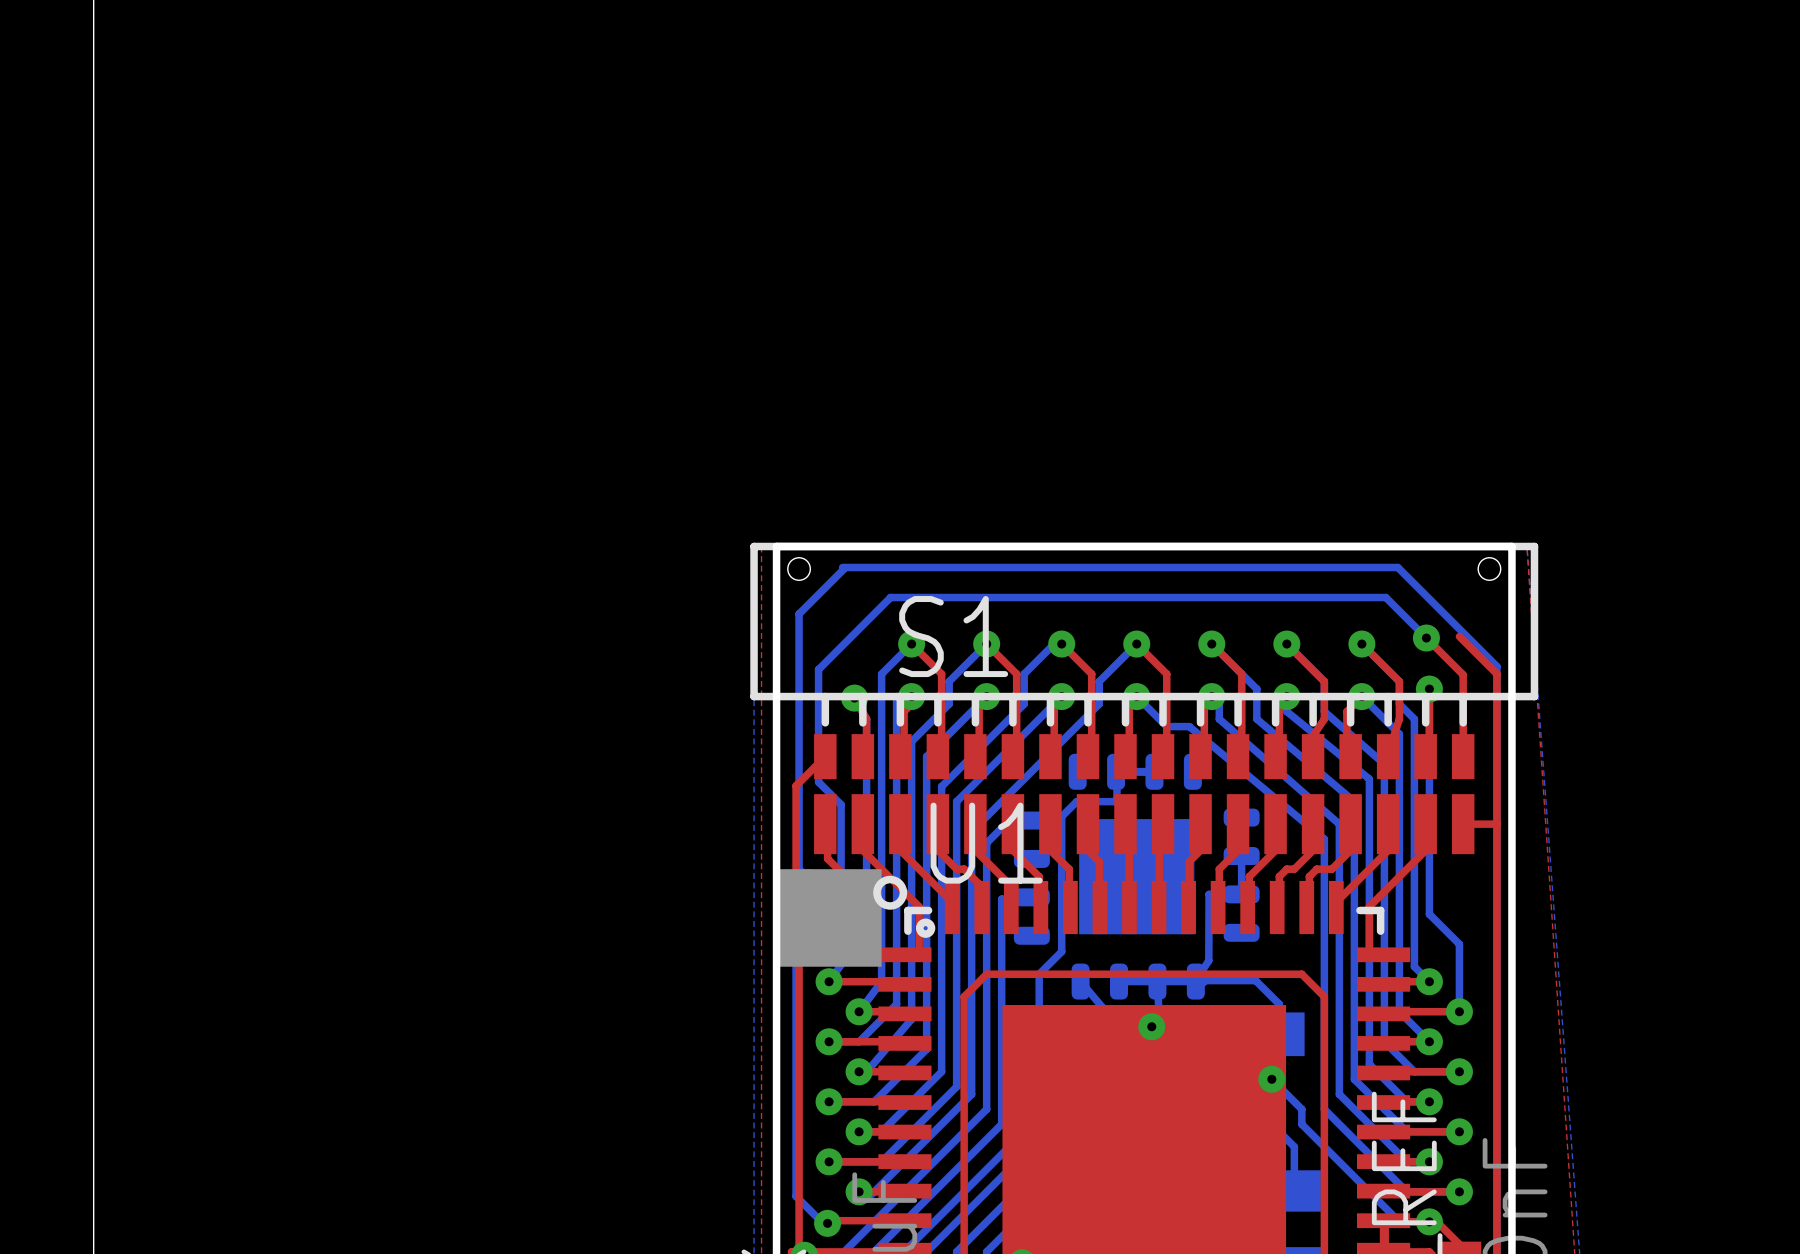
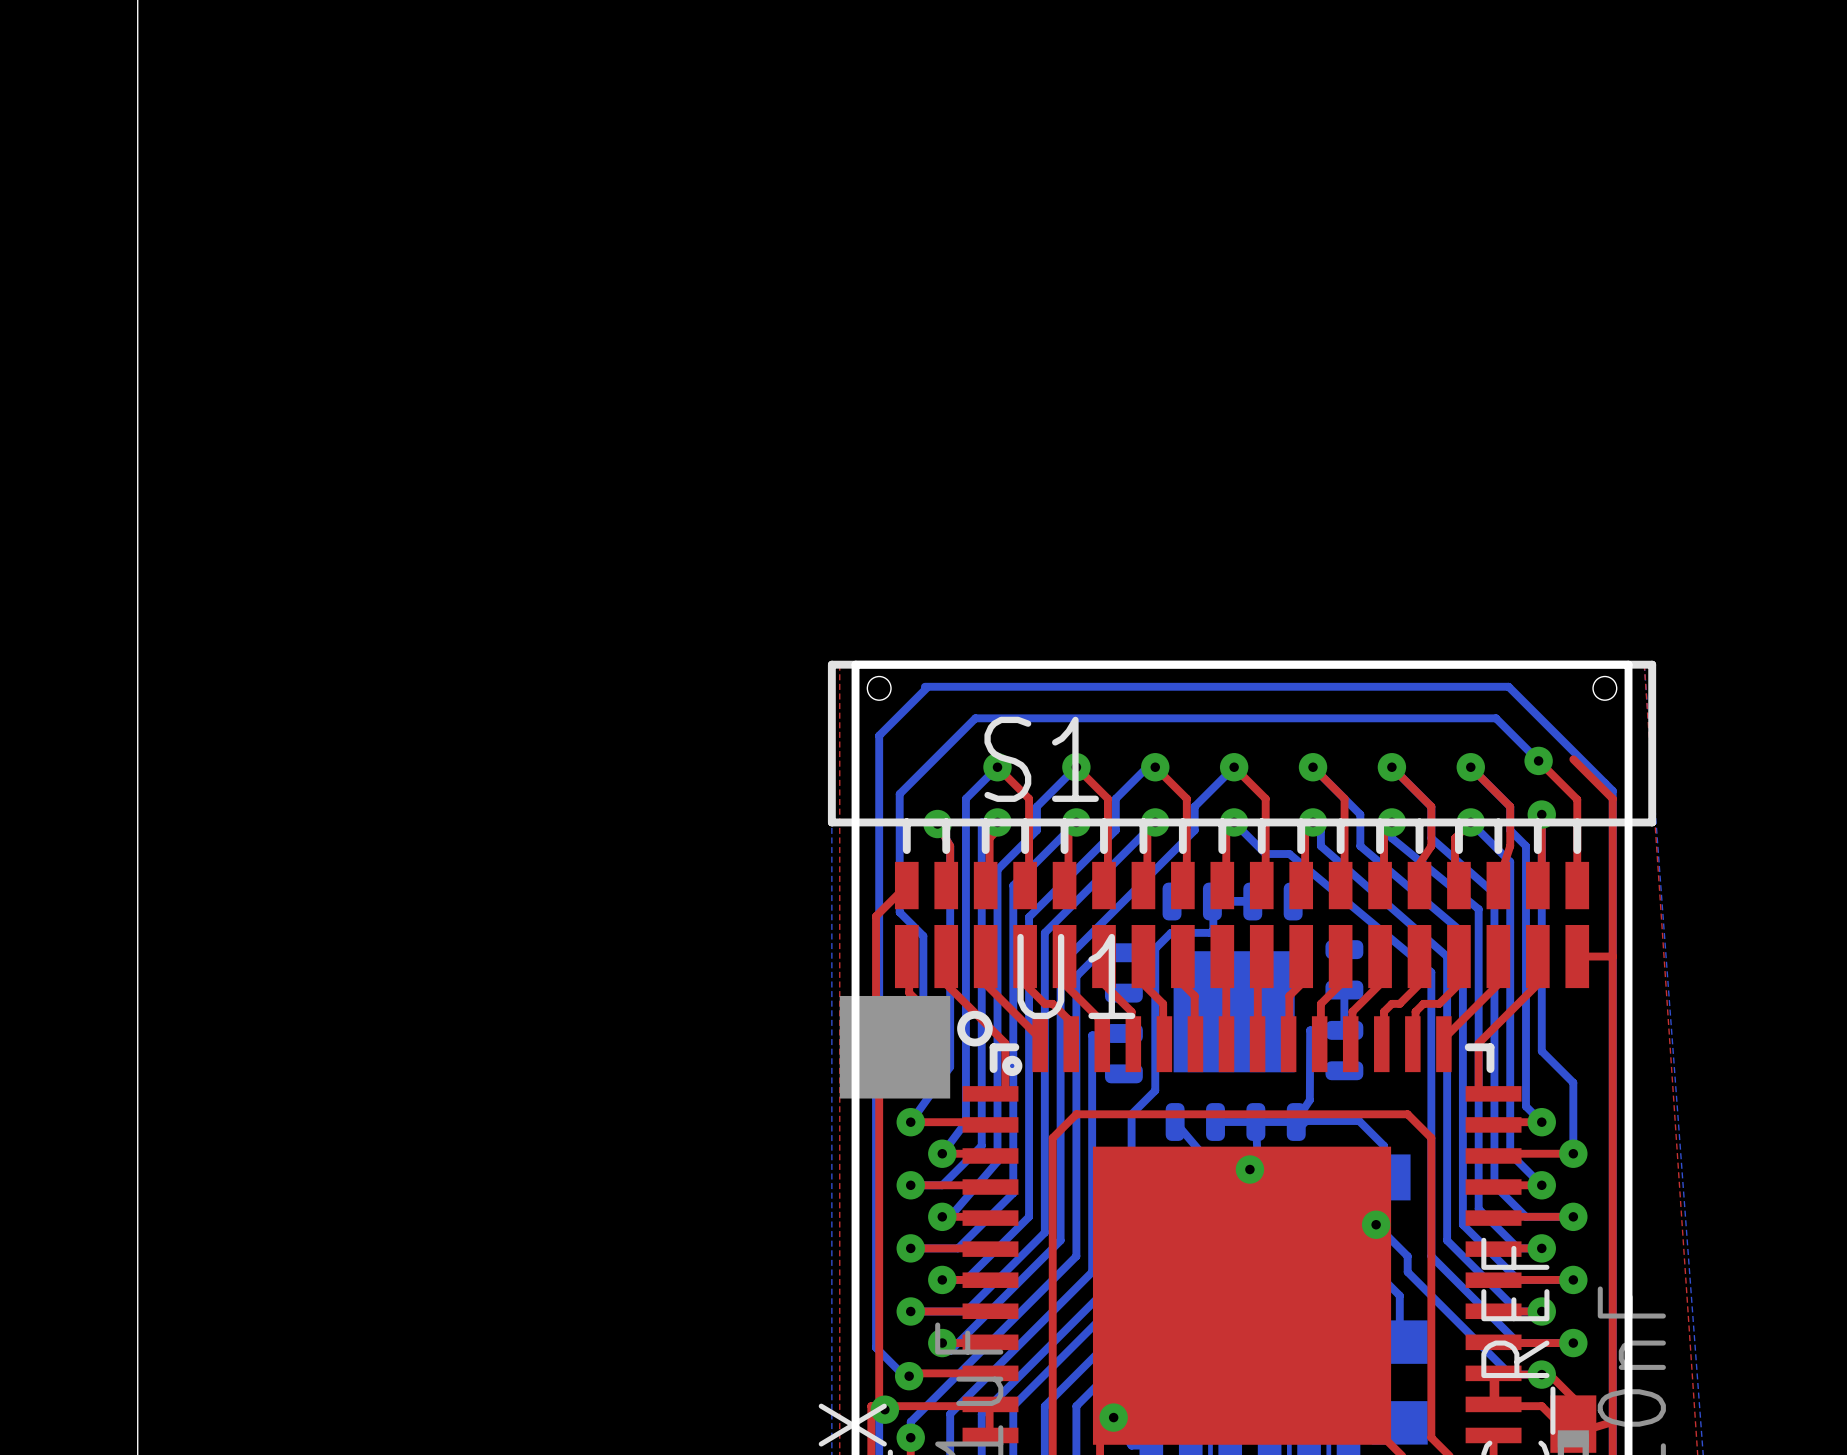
drawing position: (829, 917) -> (894, 1047)

